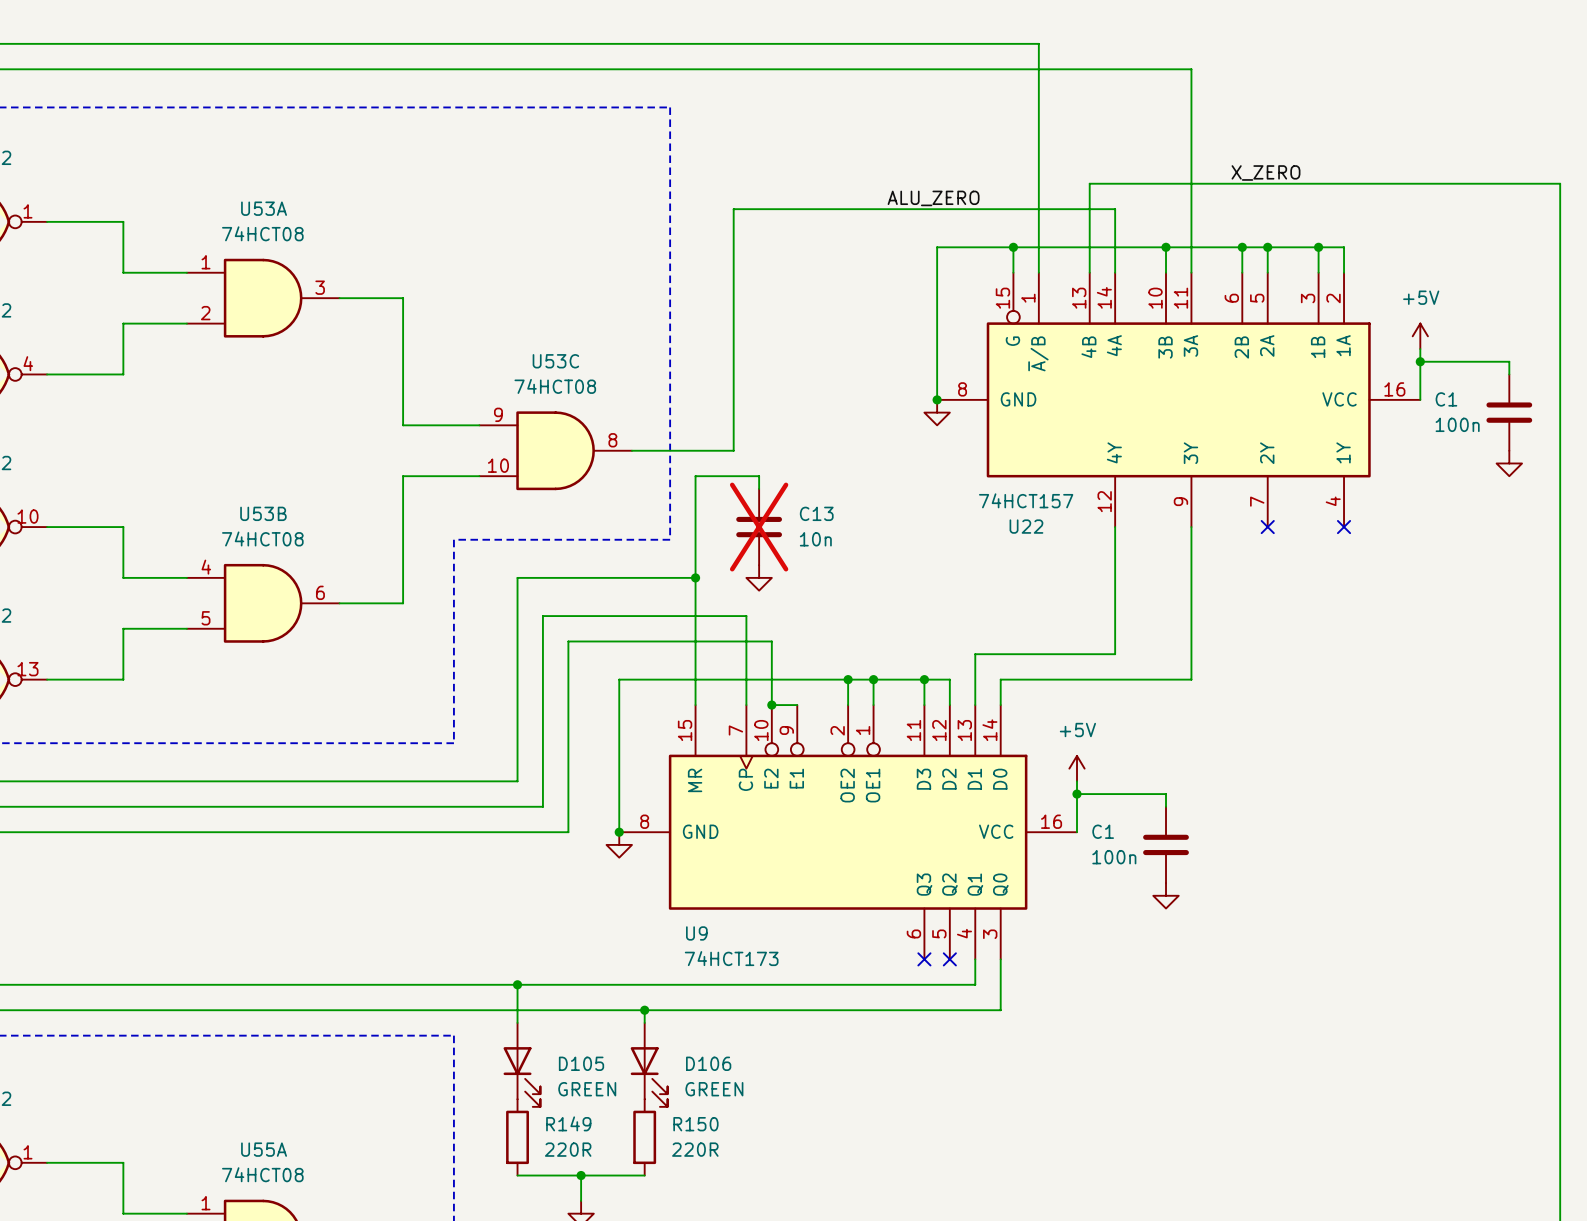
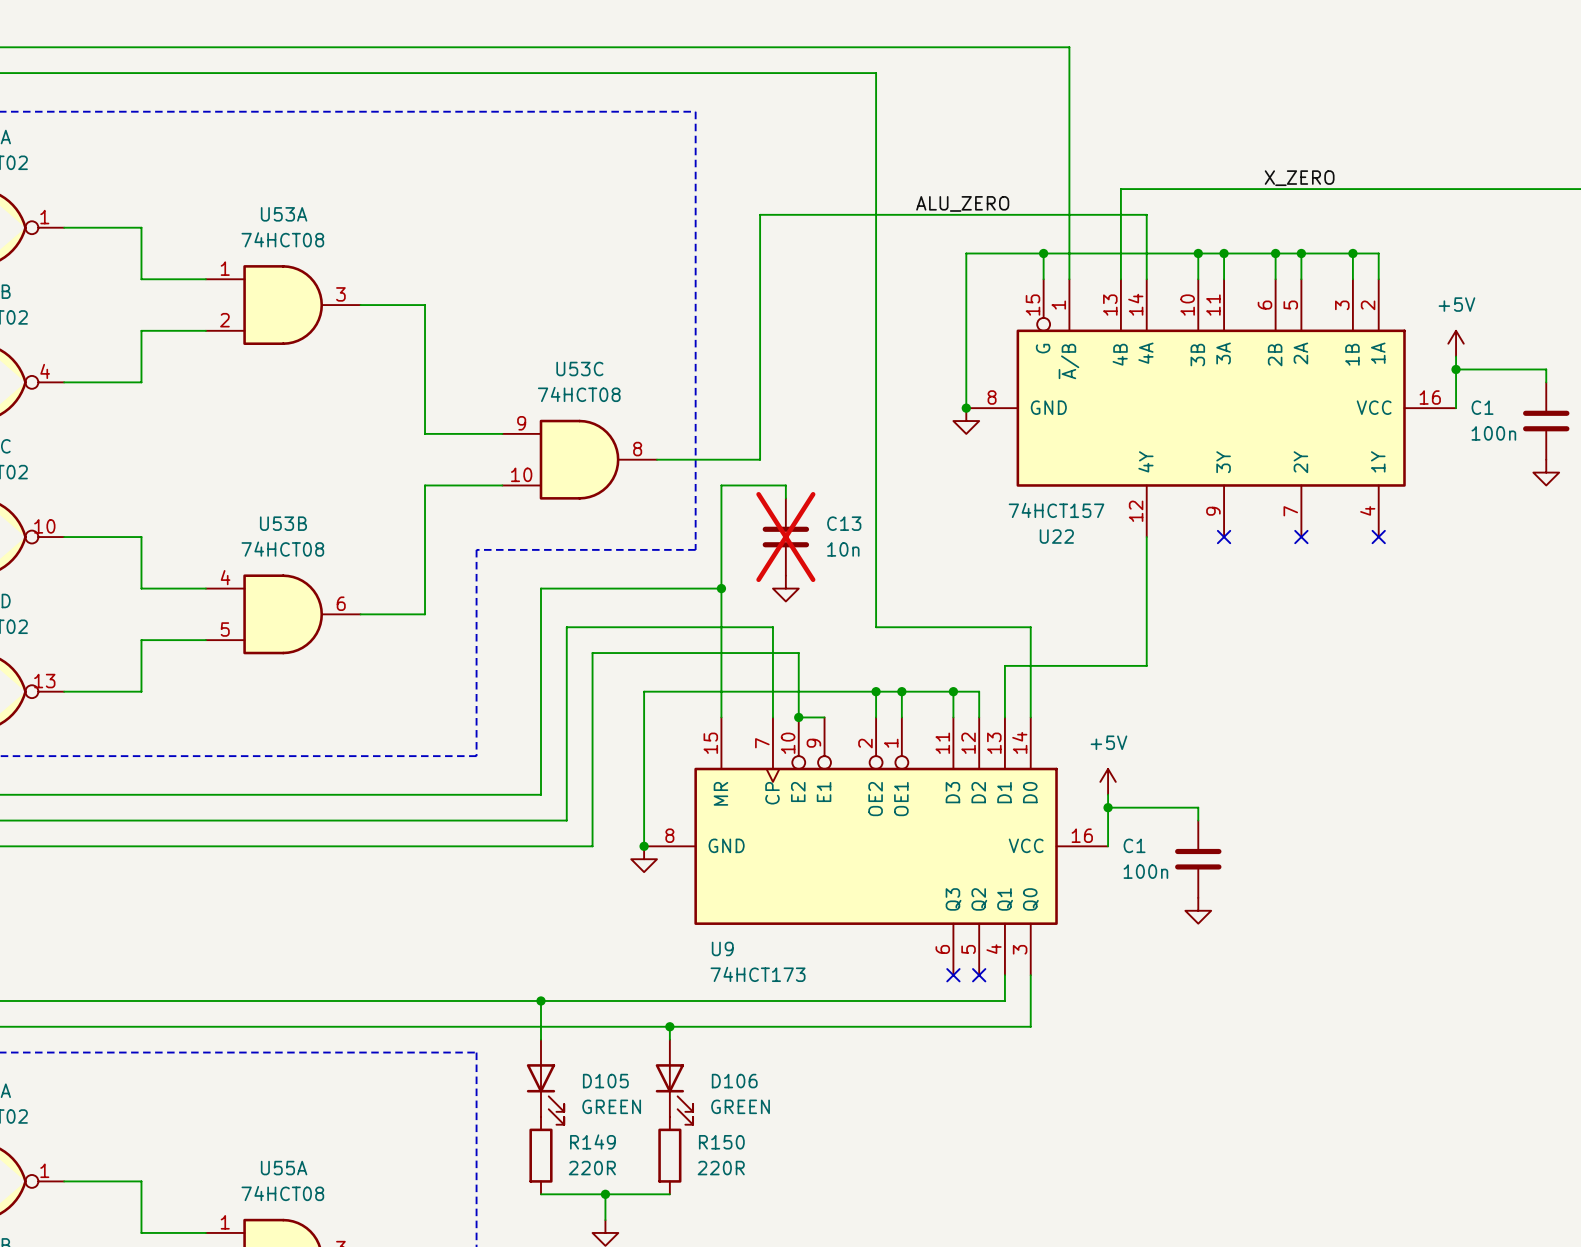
wire: (848, 69) (1191, 69) (1191, 247) -> (876, 73) (876, 627) (1030, 627) (1030, 691)
junction: none -> (1224, 253)
wire: (1191, 527) (1191, 679) (1000, 679) -> none
no-connect mark: none -> (1224, 537)

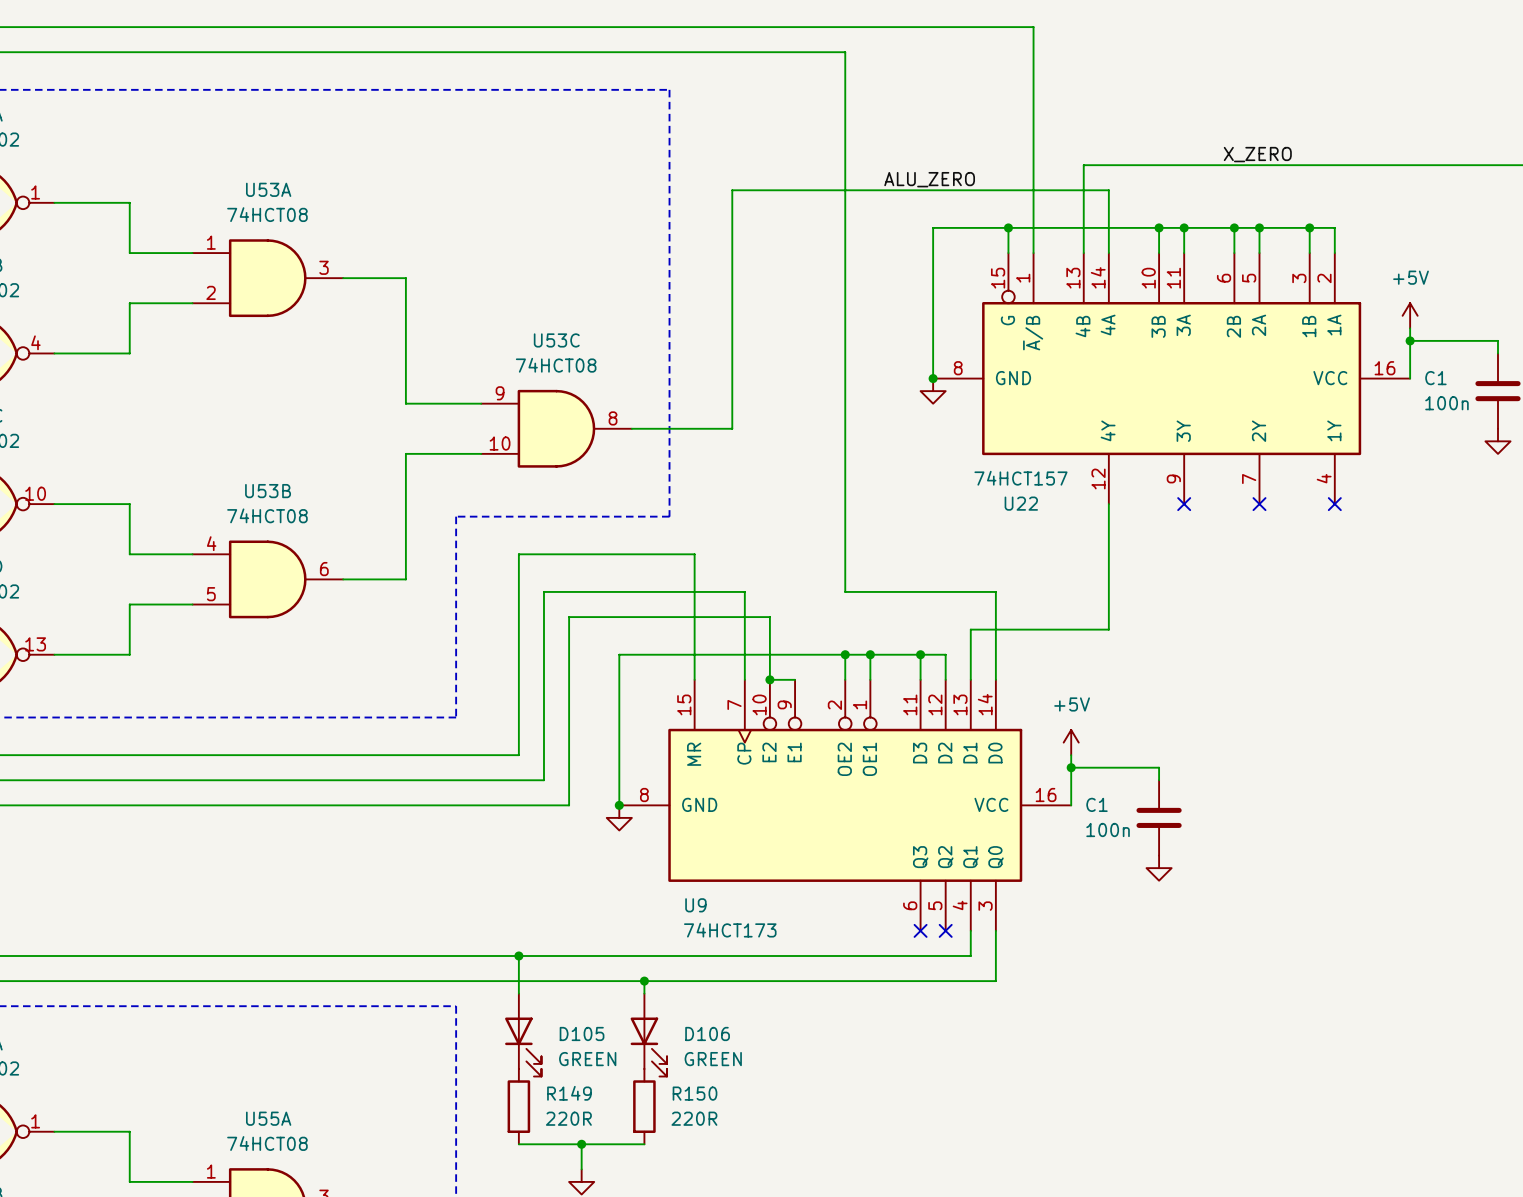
wire: (785, 498) (785, 485) (721, 485) (721, 588) -> none
C13: 10n (785, 537) -> none
junction: (721, 588) -> none
power symbol: (785, 588) -> none

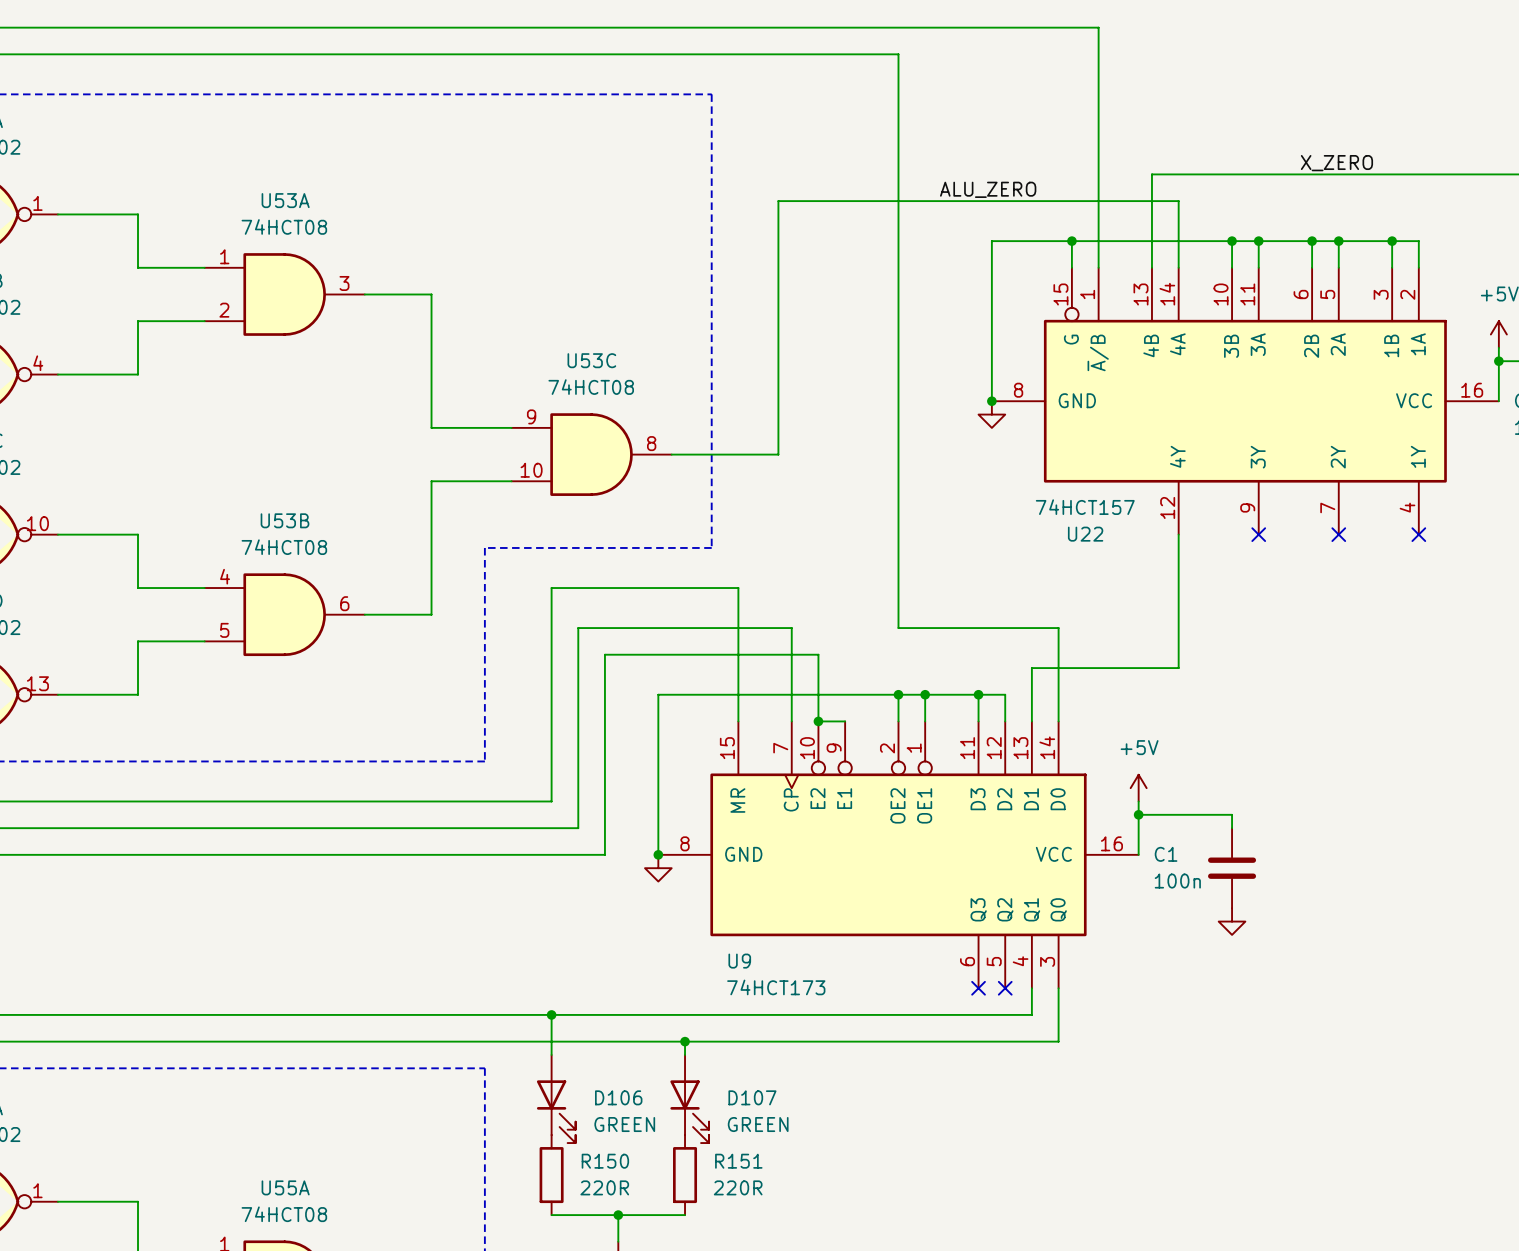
D105 name: D105 (582, 1033) -> D106 (618, 1097)
D106 name: D106 (707, 1033) -> D107 (752, 1097)
R149 name: R149 (569, 1093) -> R150 (605, 1161)
R150 name: R150 (695, 1093) -> R151 (738, 1161)

